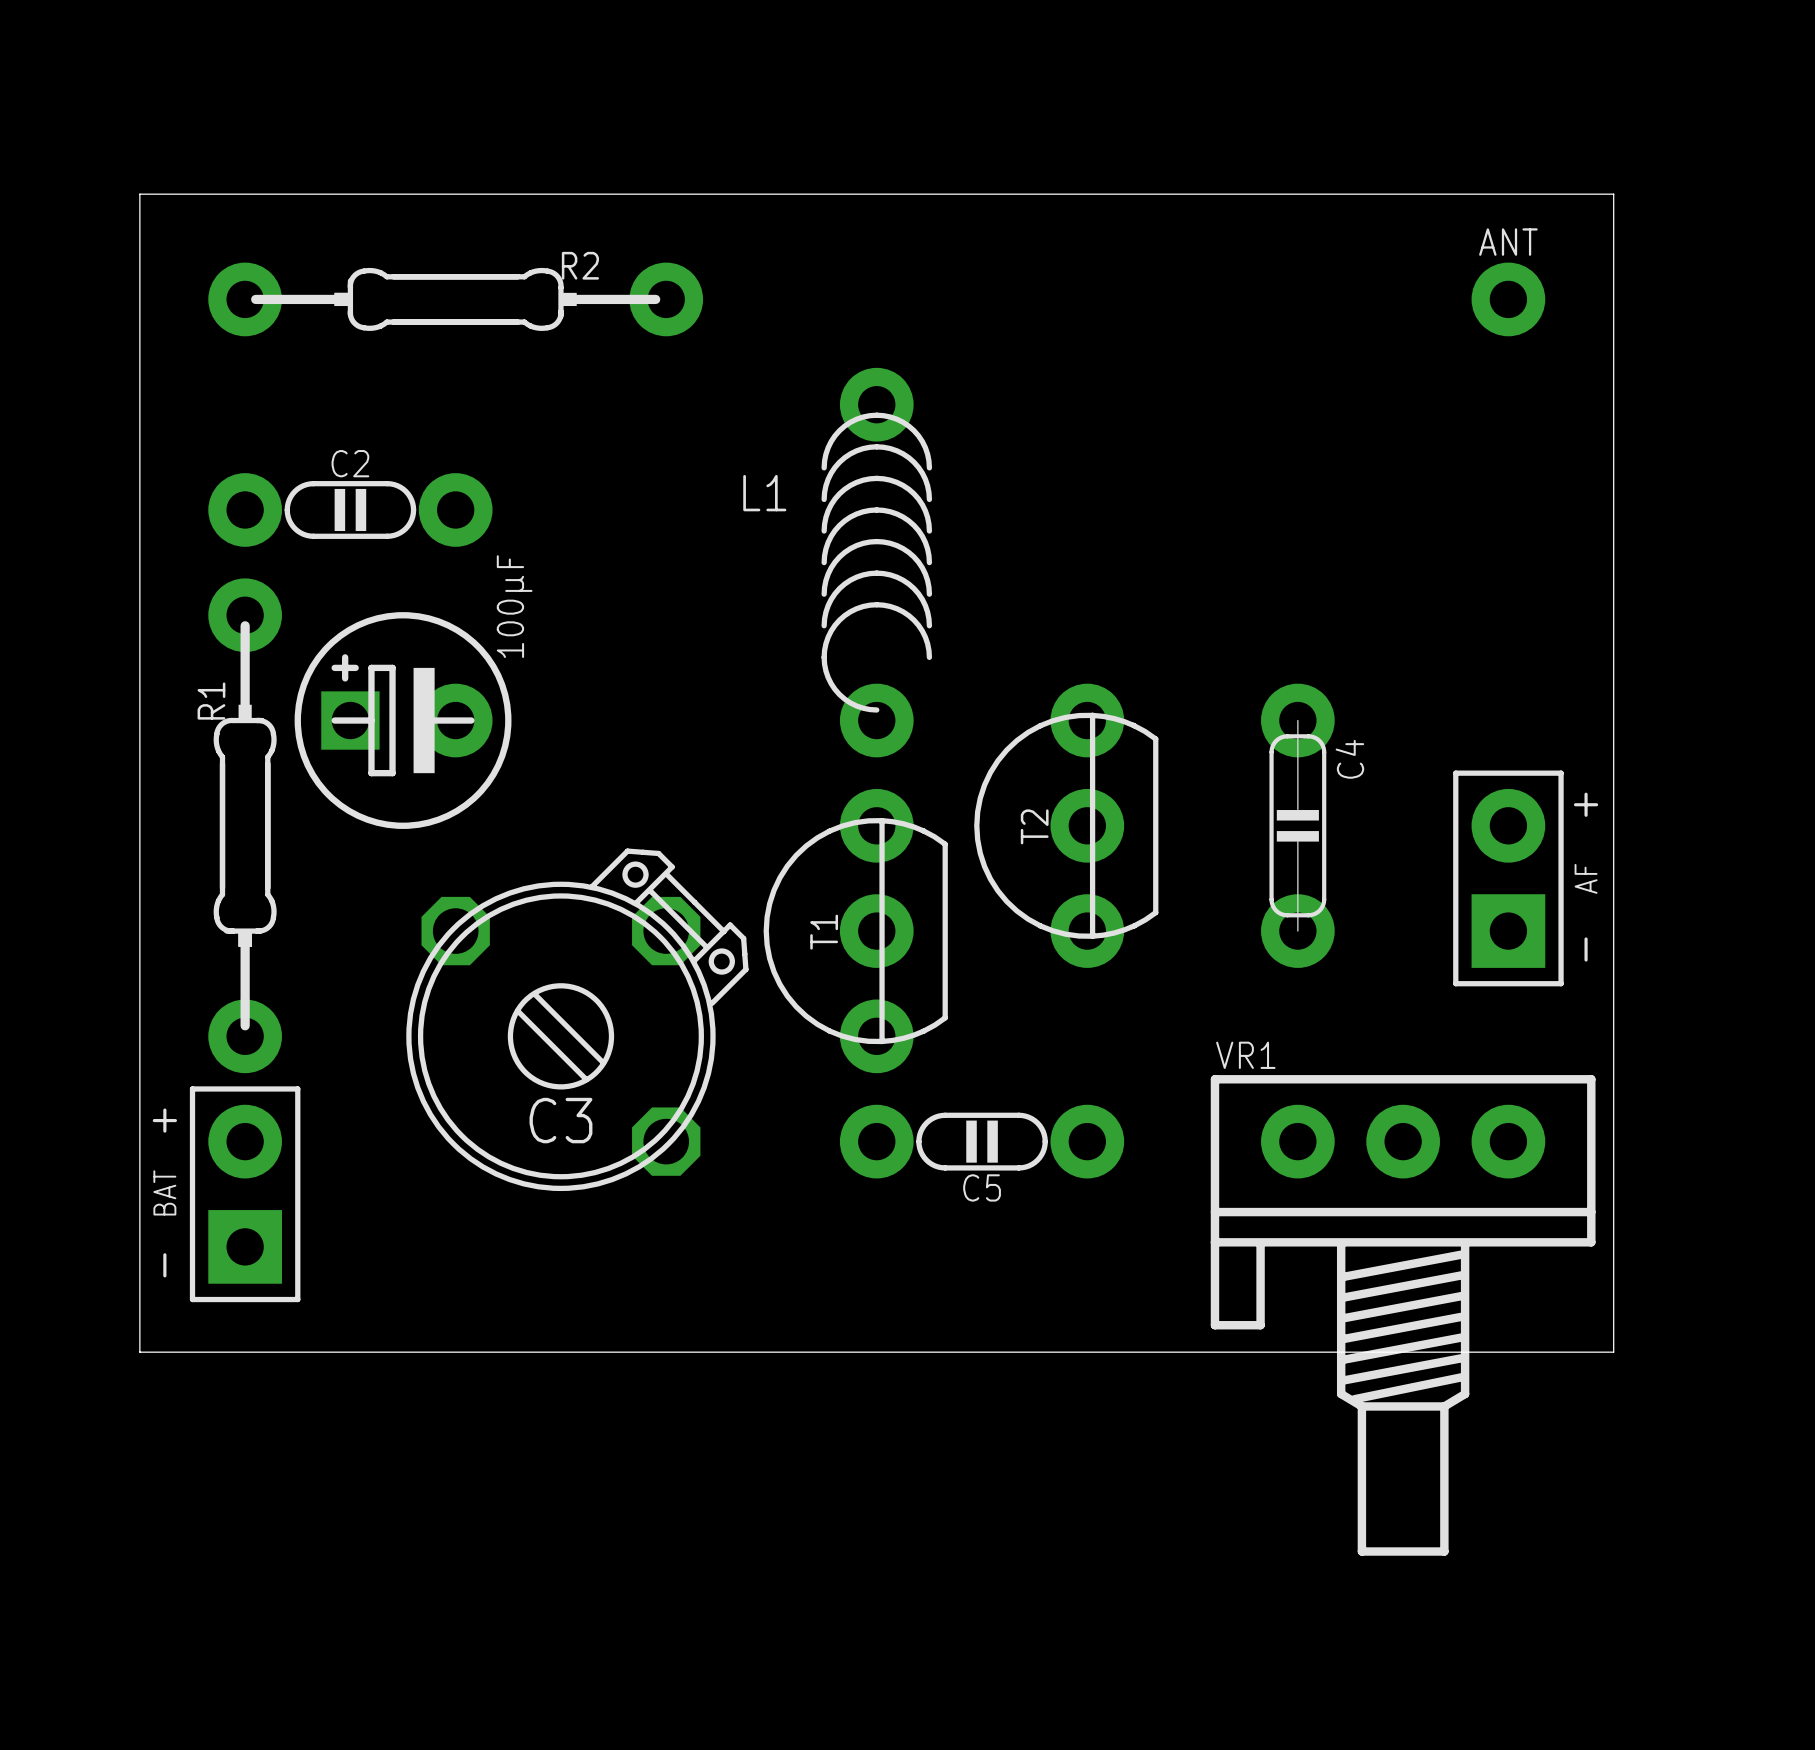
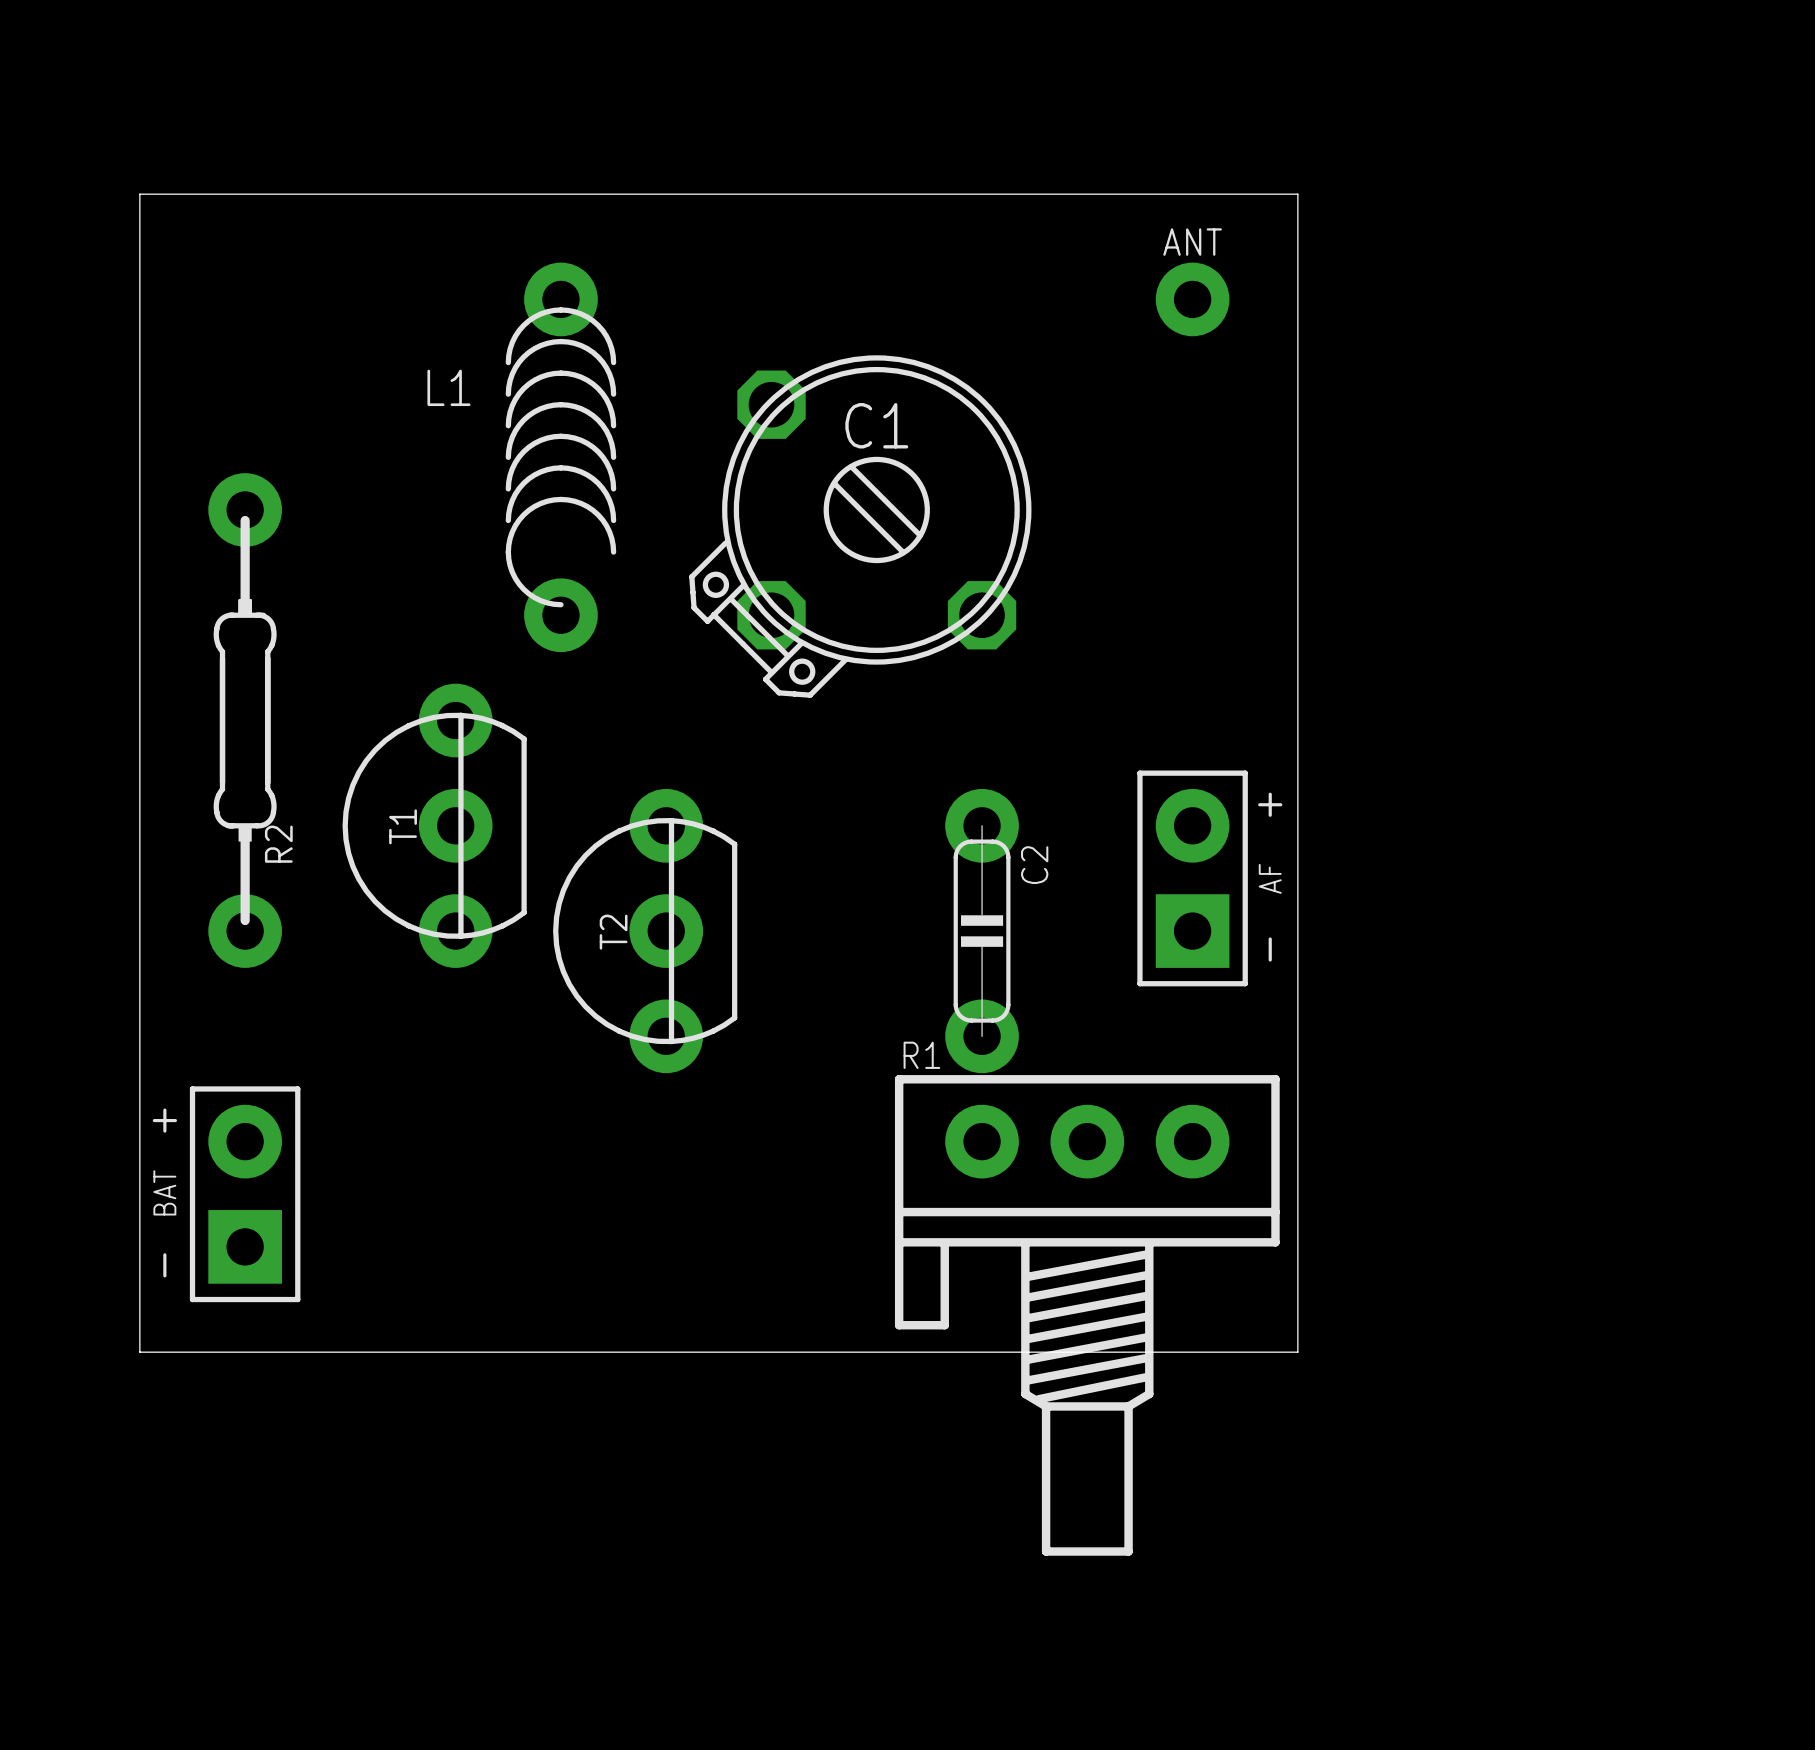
board edge: (1297, 194) (1613, 194) (1613, 1352) (1297, 1352) -> (1297, 194) (1297, 1352)
R2 rotation: 0° (455, 299) -> 90° clockwise (245, 720)
R2 position: (455, 299) -> (245, 720)
ANT position: (1508, 299) -> (1192, 299)
C2 footprint: [208, 473, 493, 547] -> [945, 788, 1019, 1074]
C1: none -> (860, 526)
L1 position: (876, 562) -> (560, 457)
R1 footprint: [208, 578, 282, 1074] -> [894, 1075, 1280, 1556]
R1 name position: R1 (211, 701) -> R1 (921, 1055)
100µF: (403, 720) -> none
T2 position: (1066, 825) -> (645, 931)
C4: (1297, 825) -> none
AF position: (1525, 878) -> (1209, 878)
T1 position: (855, 931) -> (434, 825)
C3: (577, 1019) -> none
C5: (982, 1141) -> none
VR1: (1403, 1315) -> none

